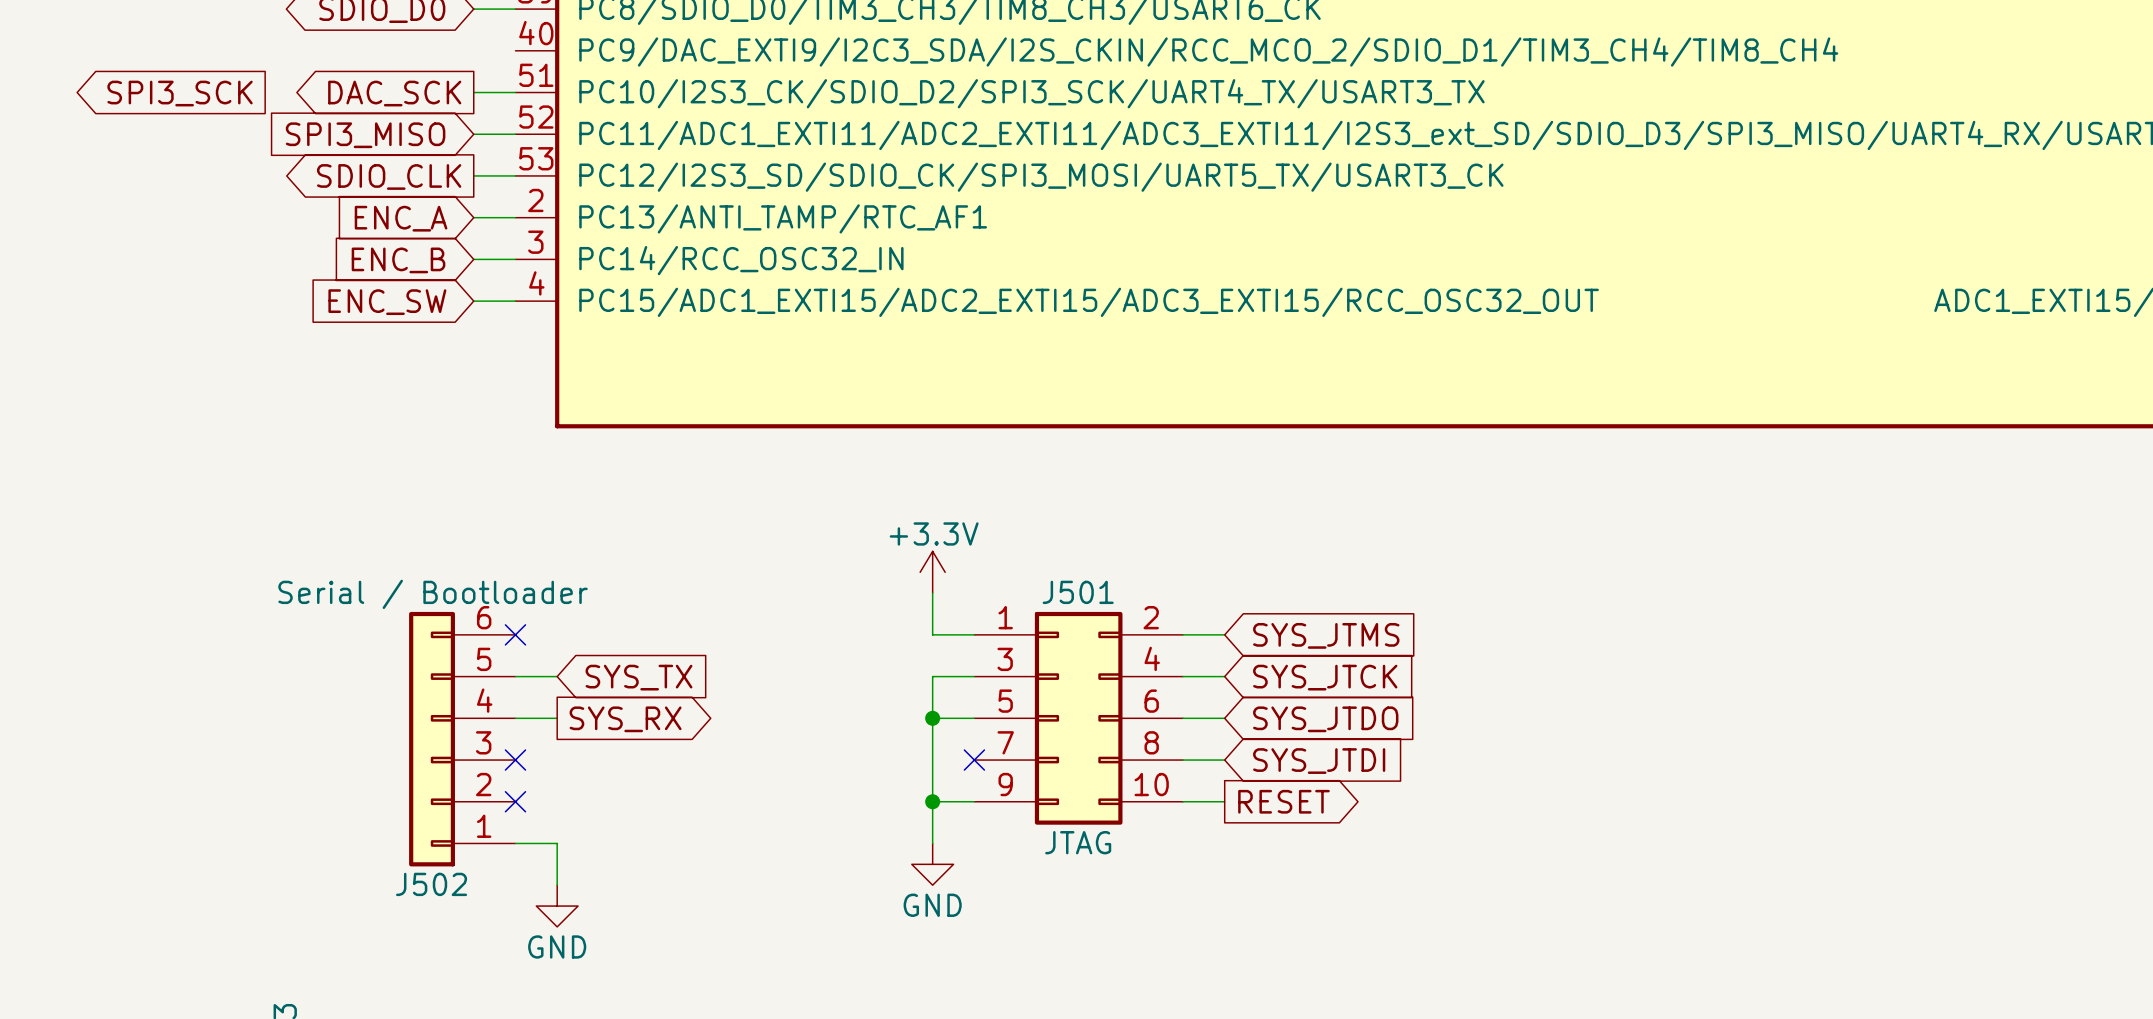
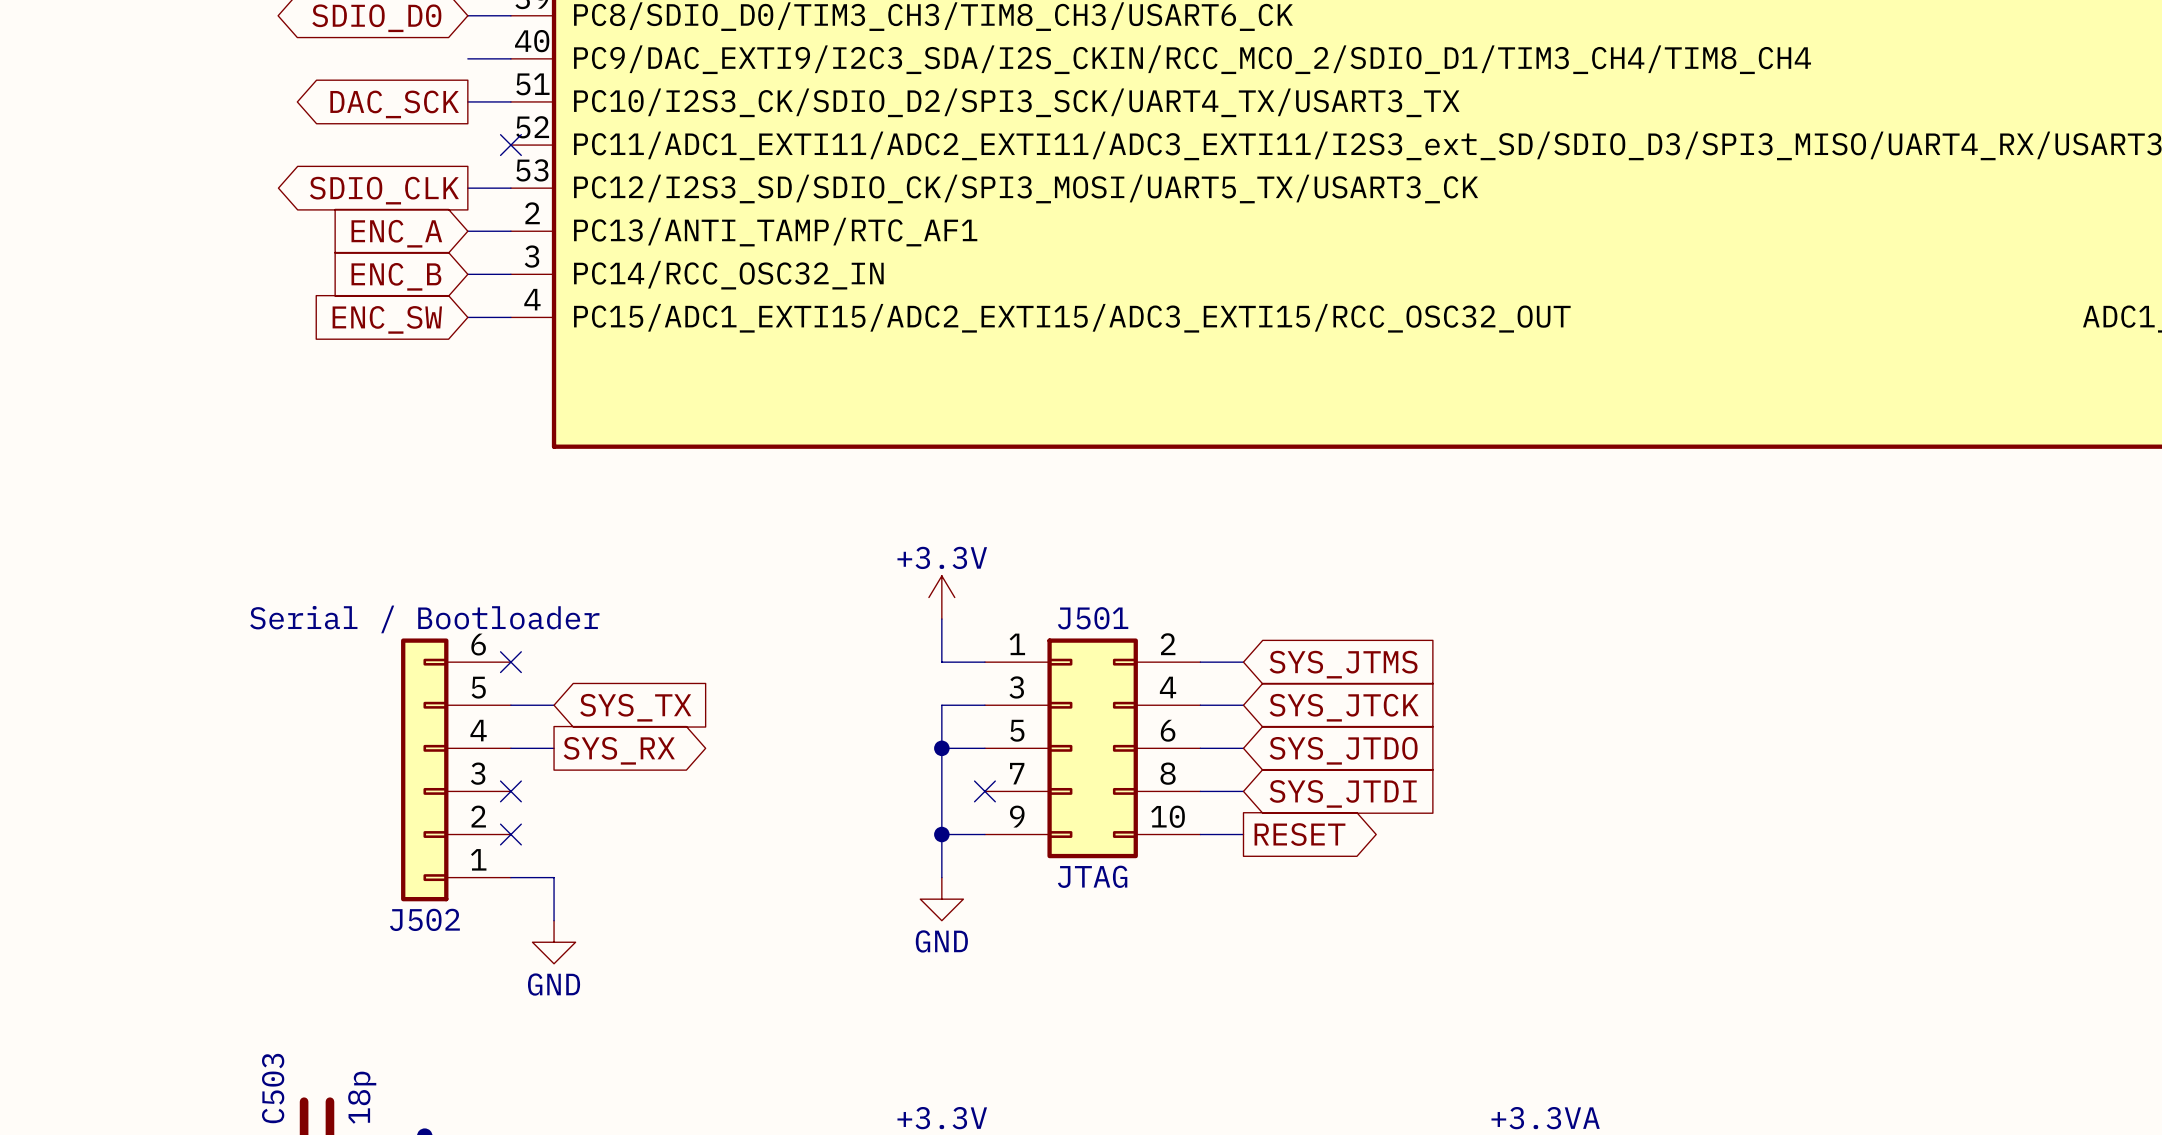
global label: SPI3_SCK (180, 93) -> none
wire: (473, 134) (515, 134) -> (467, 58) (510, 58)
no-connect mark: none -> (510, 145)
global label: SPI3_MISO (365, 135) -> none

